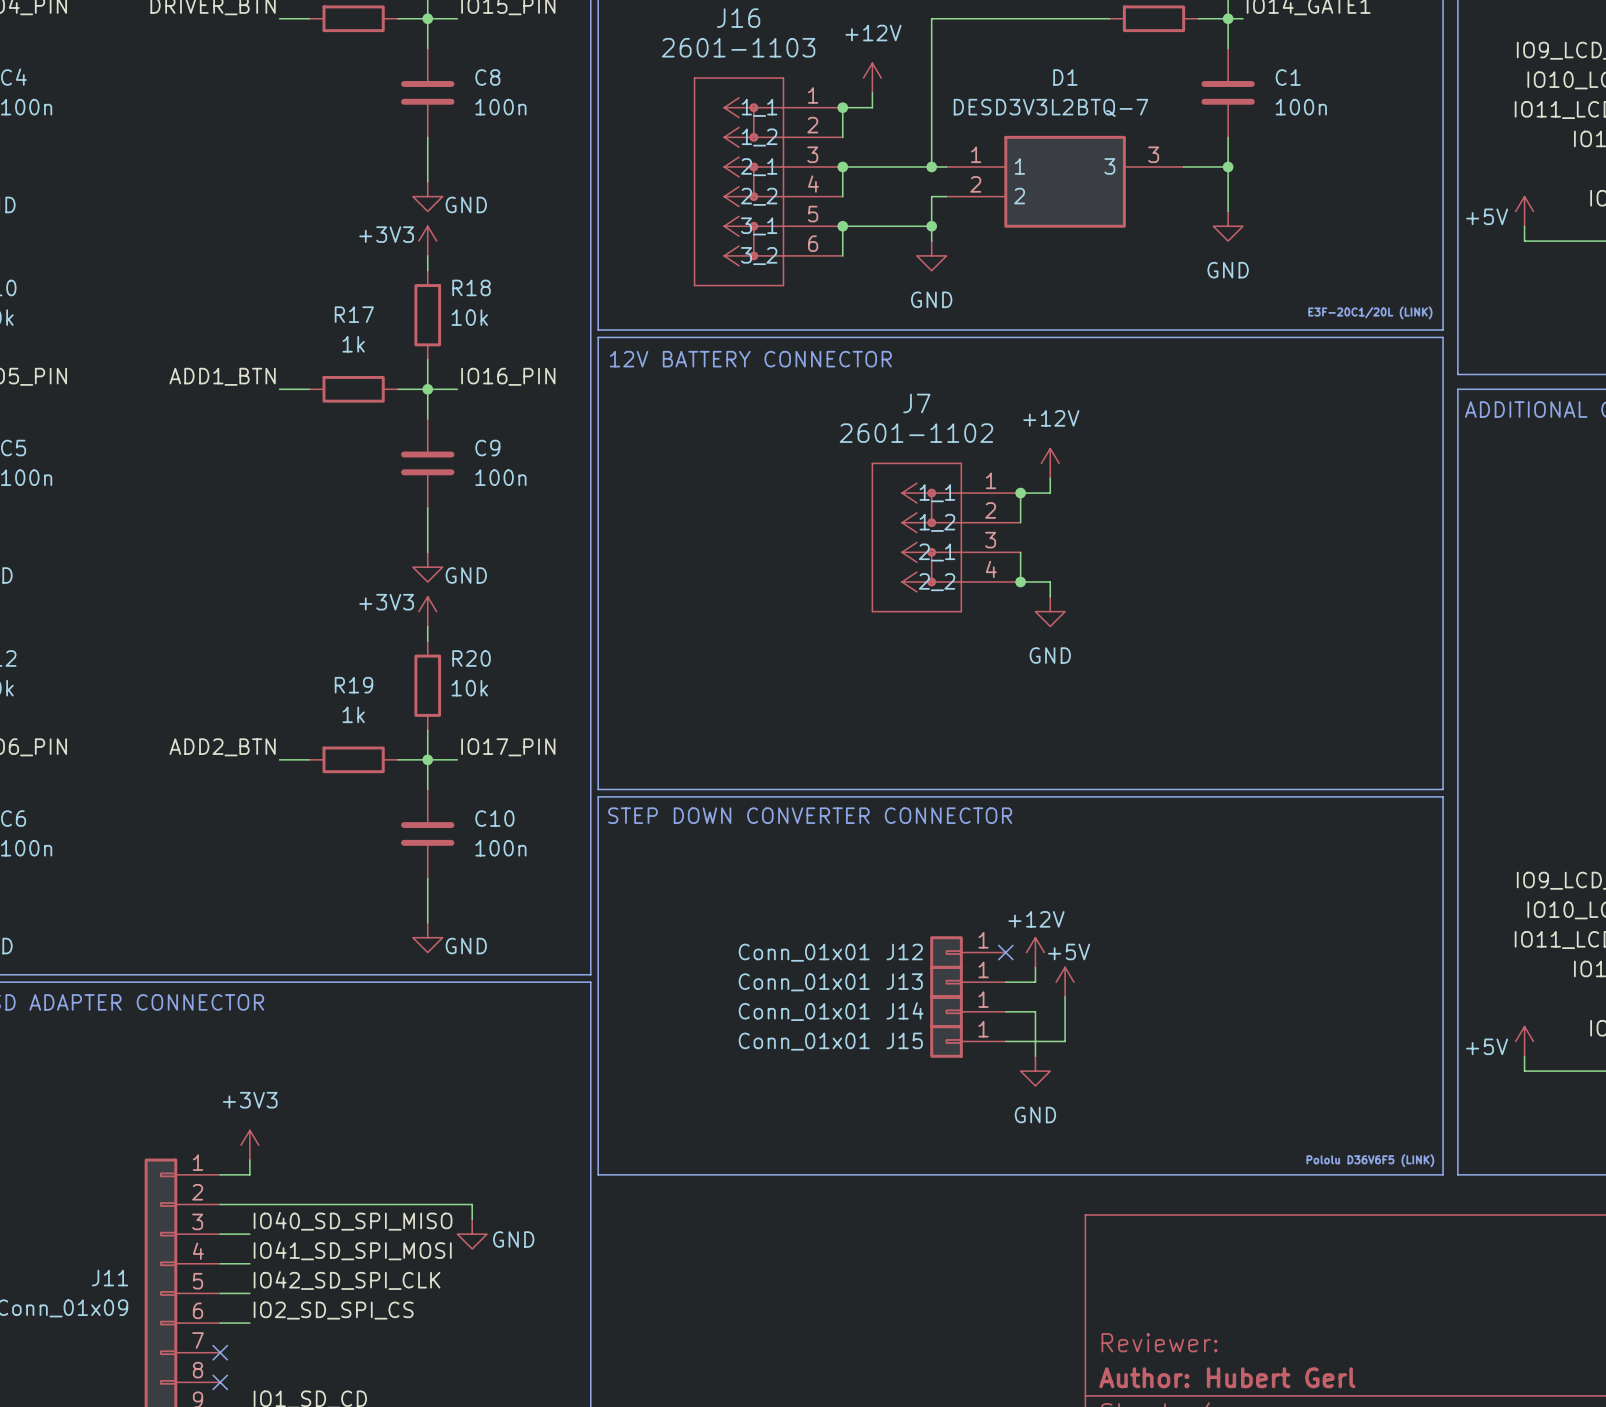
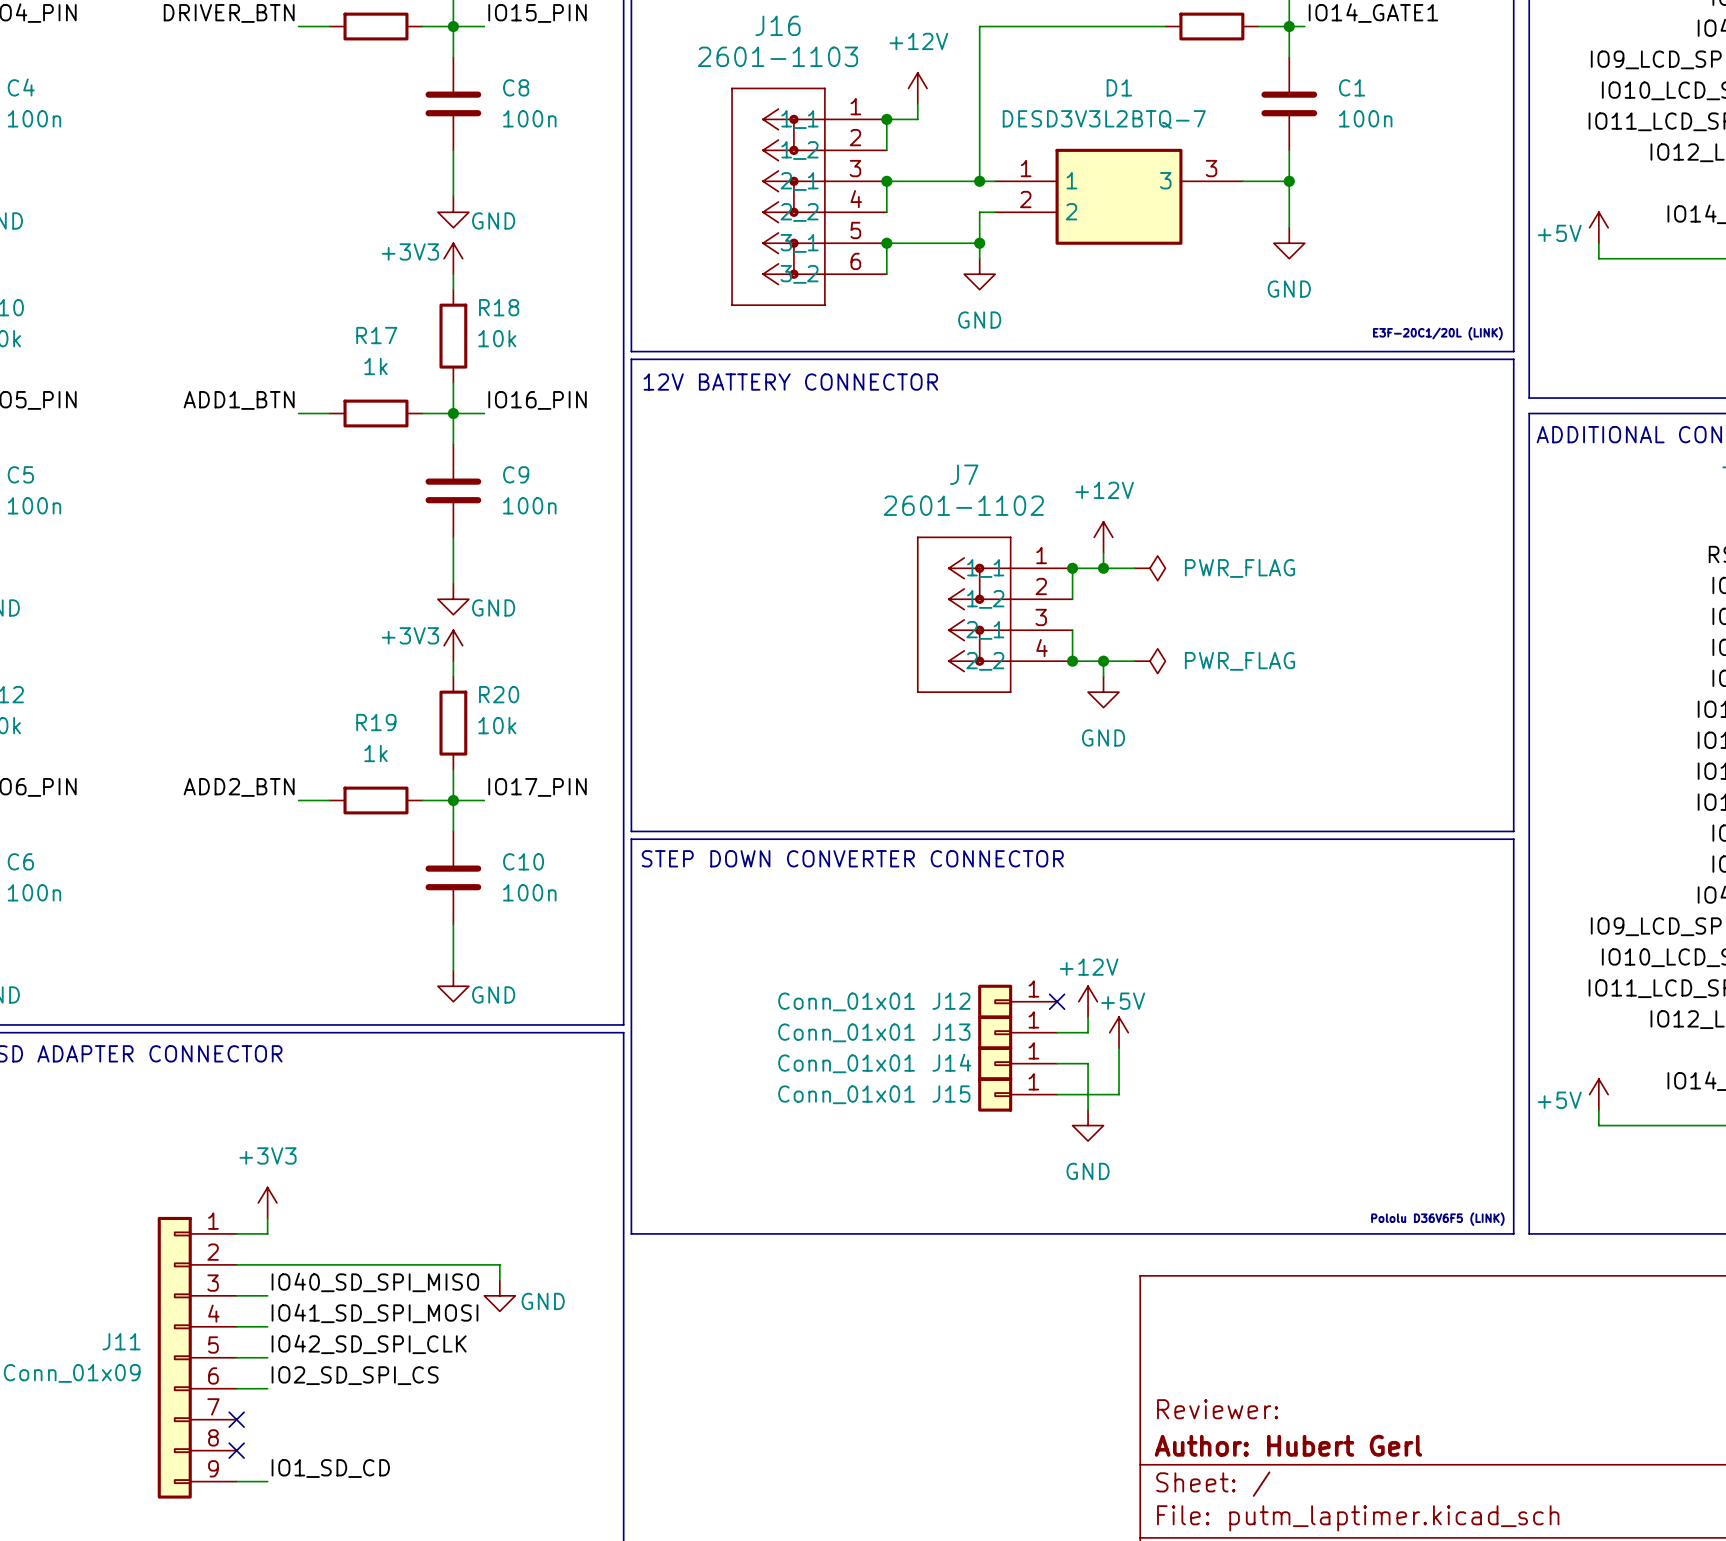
power symbol position: +12V (1050, 463) -> +12V (1103, 537)
wire: (1050, 478) (1050, 493) (1020, 493) (1020, 522) -> none
junction: (1020, 493) -> none
wire: none -> (1103, 552) (1103, 568)
J7 position: (946, 537) -> (994, 614)
junction: none -> (1072, 568)
junction: none -> (1103, 568)
wire: none -> (1134, 568) (1072, 568) (1072, 583)
power symbol: none -> PWR_FLAG (1149, 568)
wire: (1020, 567) (1020, 581) (1050, 581) (1050, 596) -> none
junction: (1020, 581) -> none
wire: none -> (1072, 630) (1072, 661) (1134, 661)
power symbol position: GND (1050, 611) -> GND (1103, 692)
junction: none -> (1072, 661)
wire: none -> (1103, 661) (1103, 676)
junction: none -> (1103, 661)
power symbol: none -> PWR_FLAG (1149, 661)

